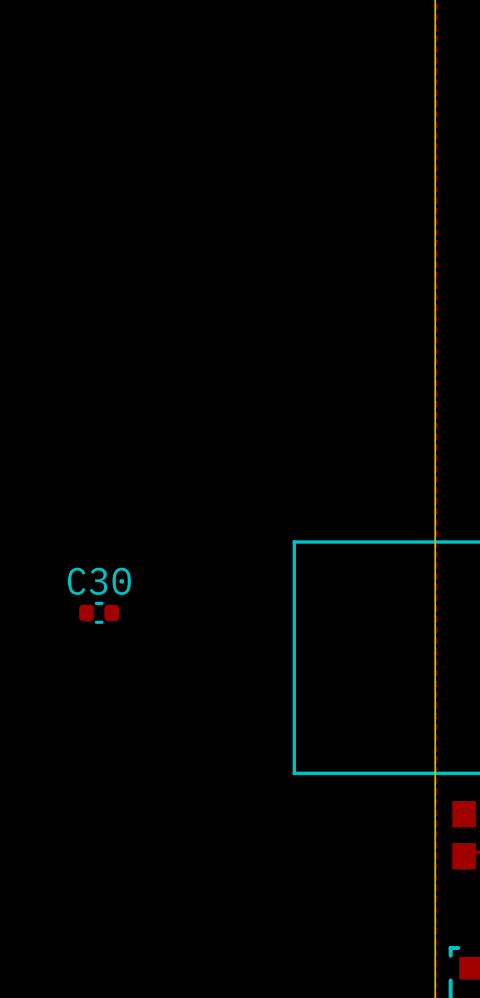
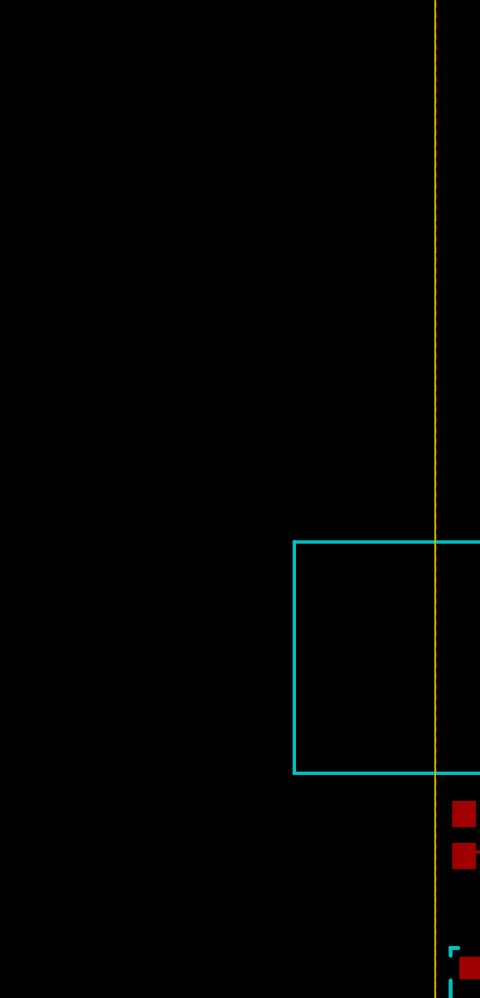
C30: (99, 612) -> none

